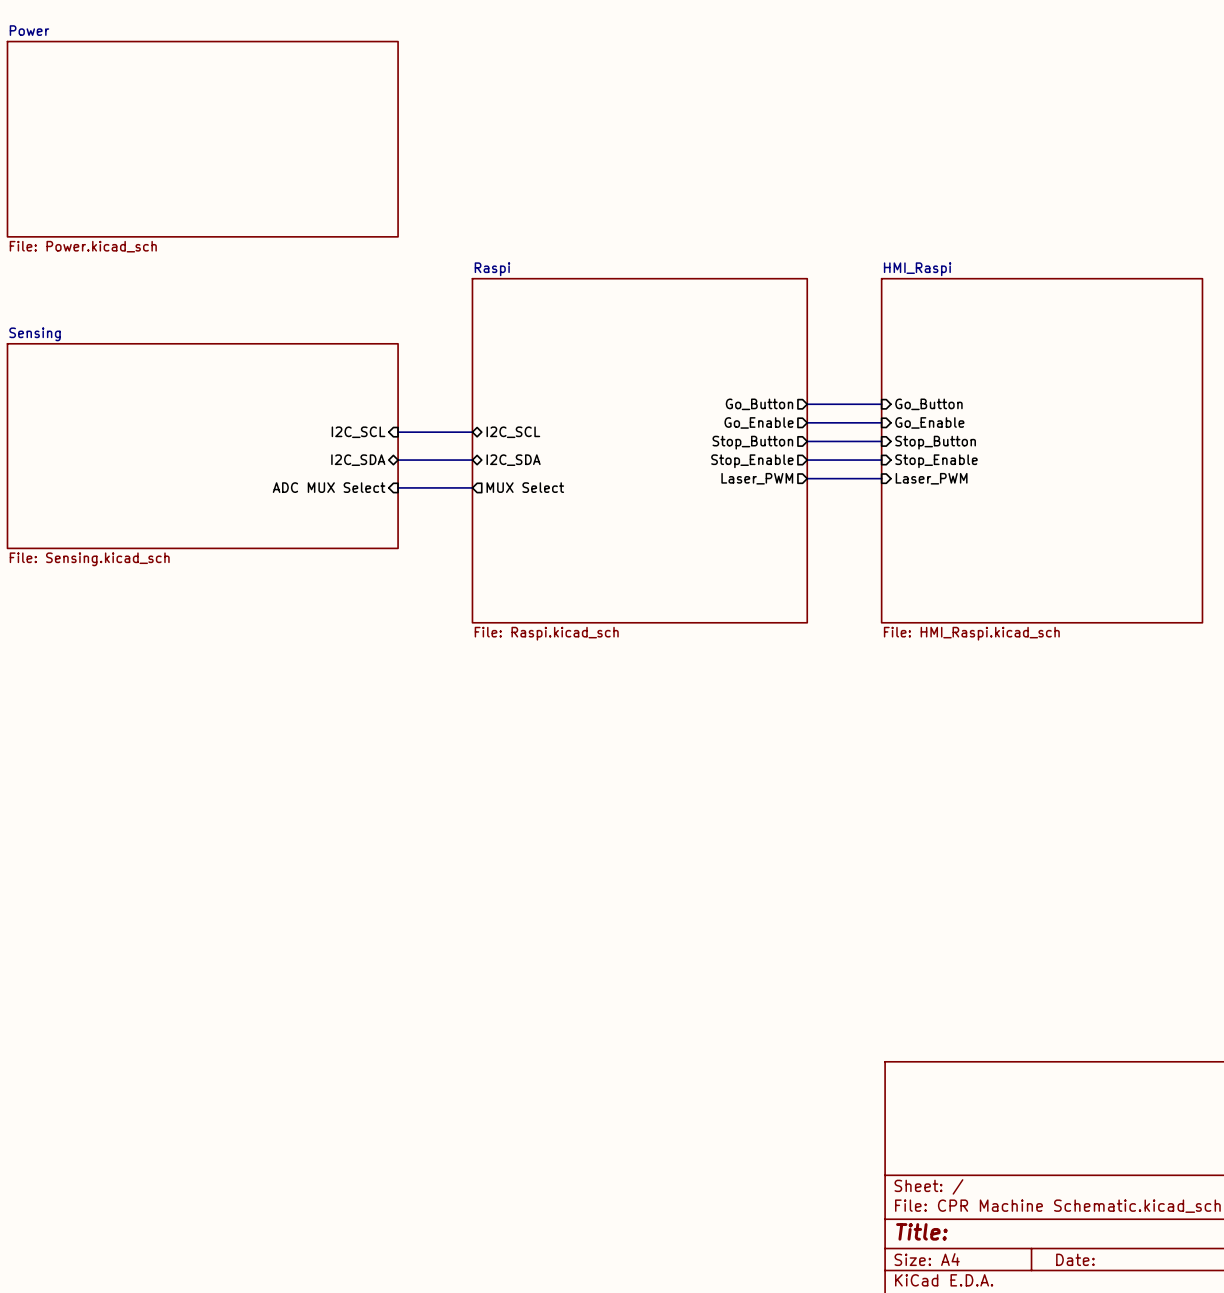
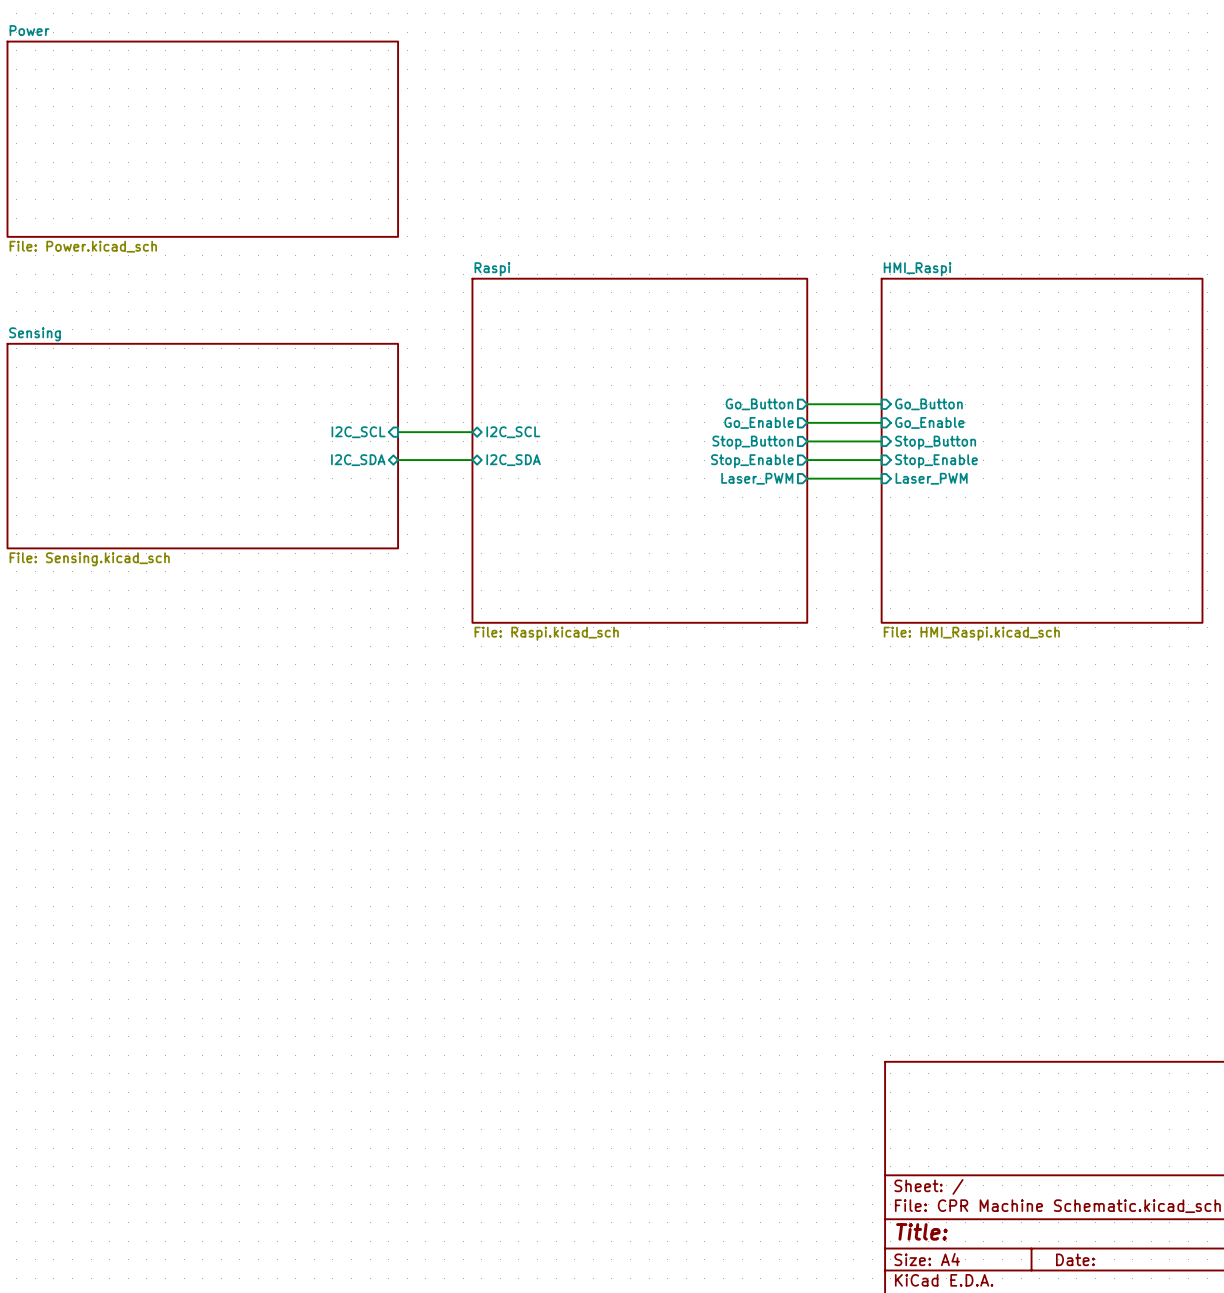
sheet pin: ADC MUX Select (329, 487) -> none
wire: (398, 487) (472, 487) -> none
sheet pin: MUX Select (525, 487) -> none

